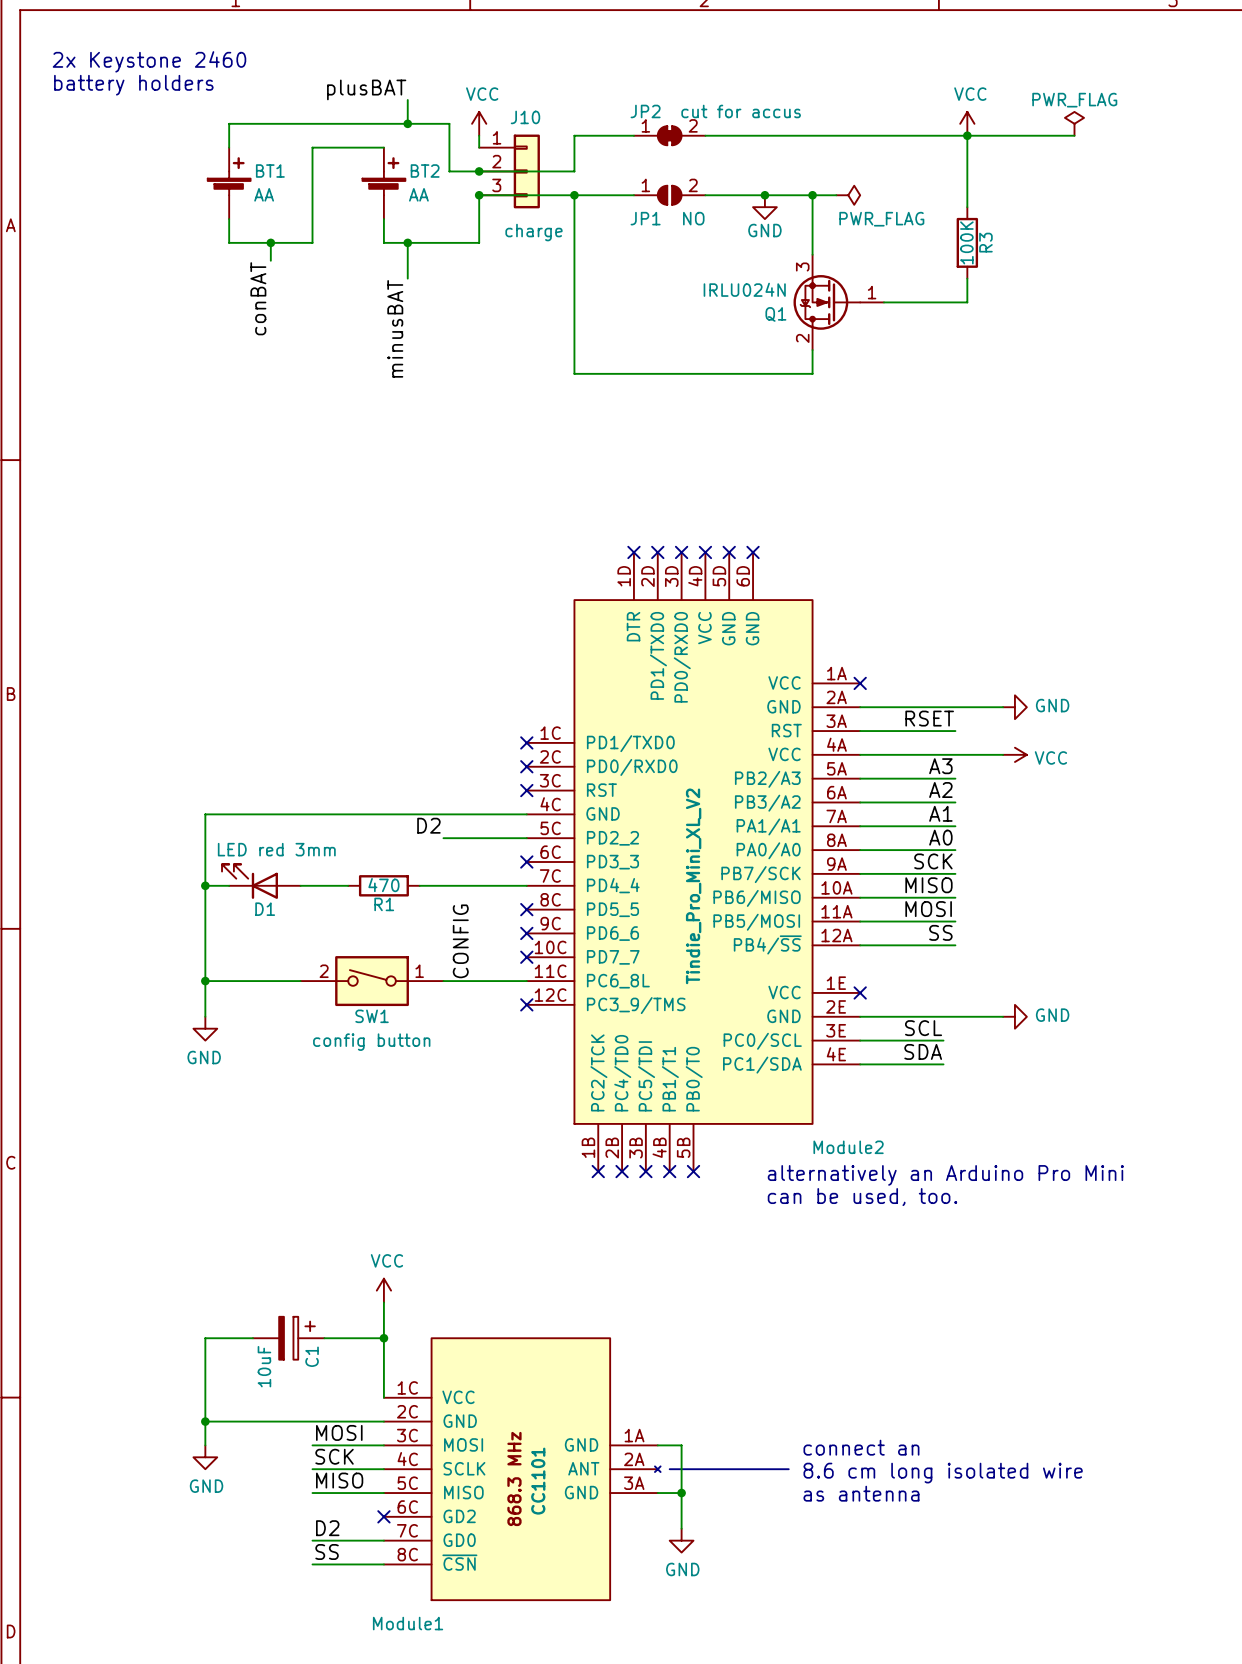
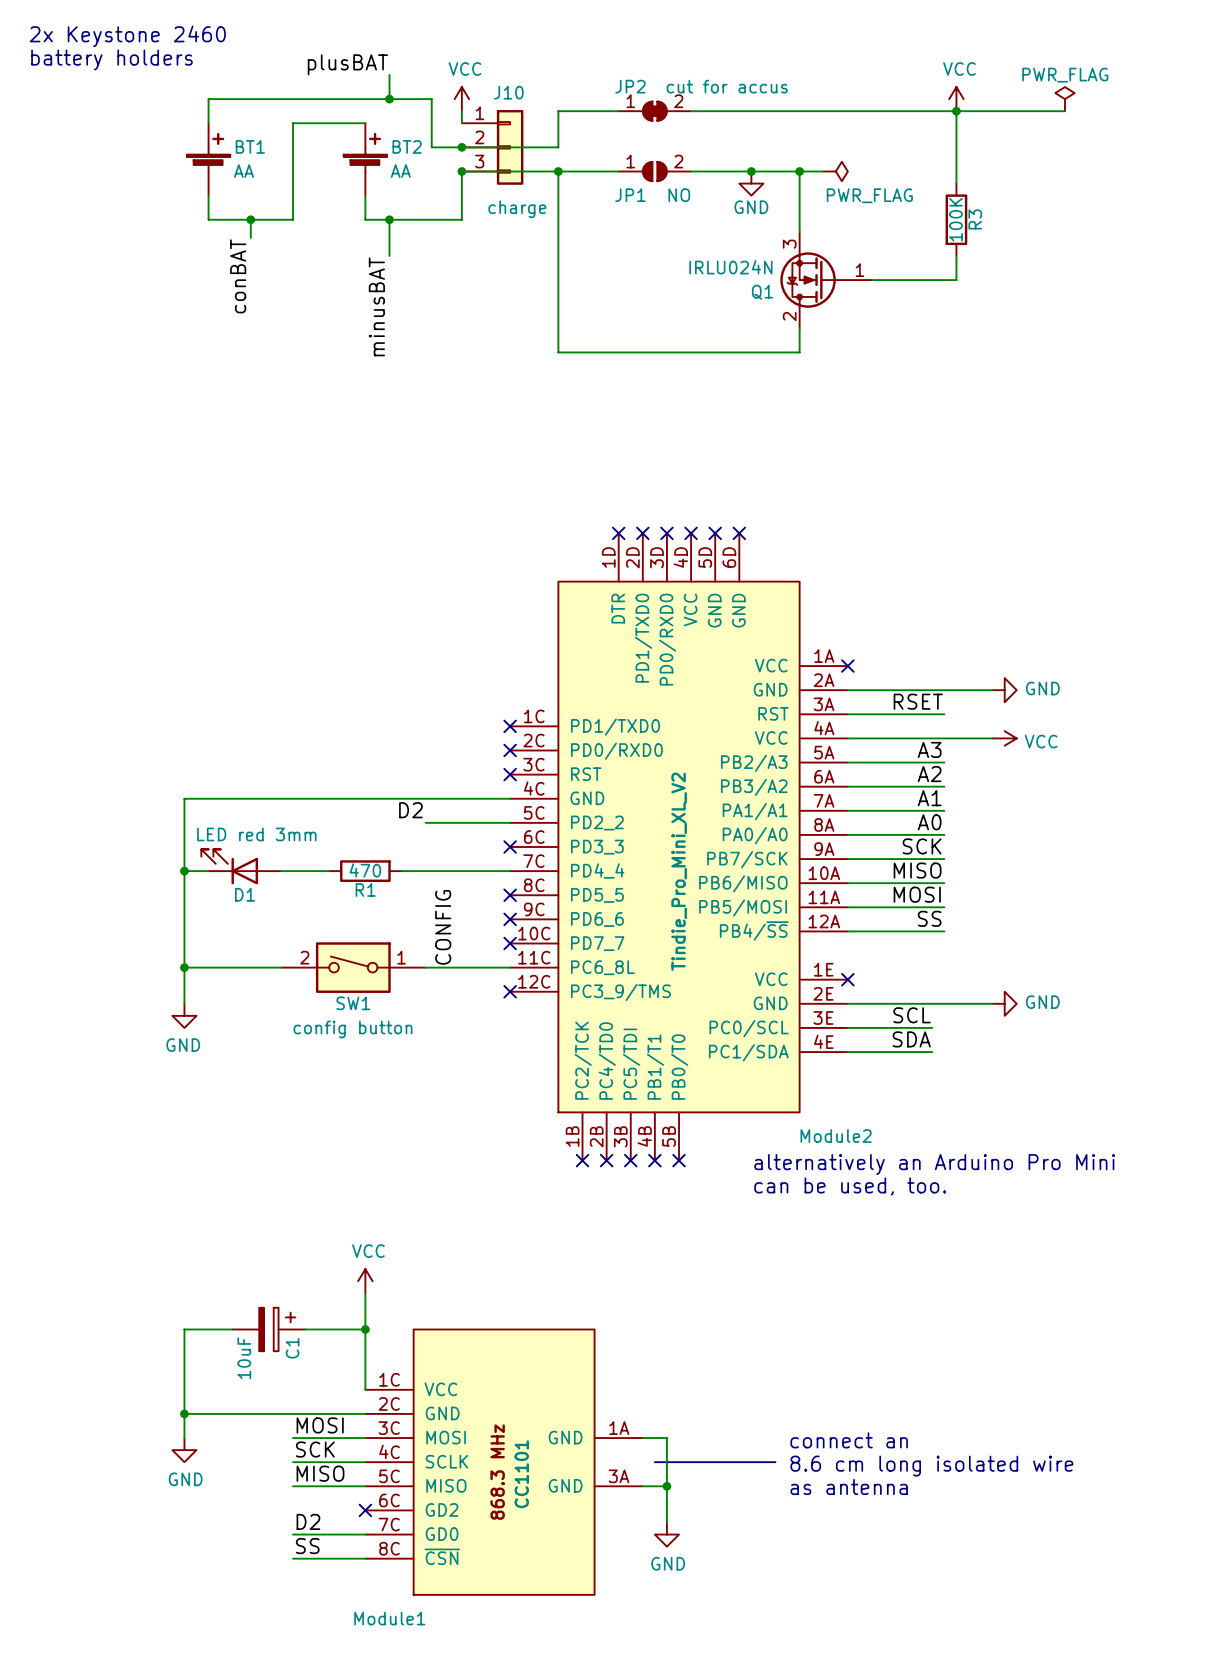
Module1 symbol: [383, 1338, 661, 1601] -> [365, 1329, 643, 1595]

